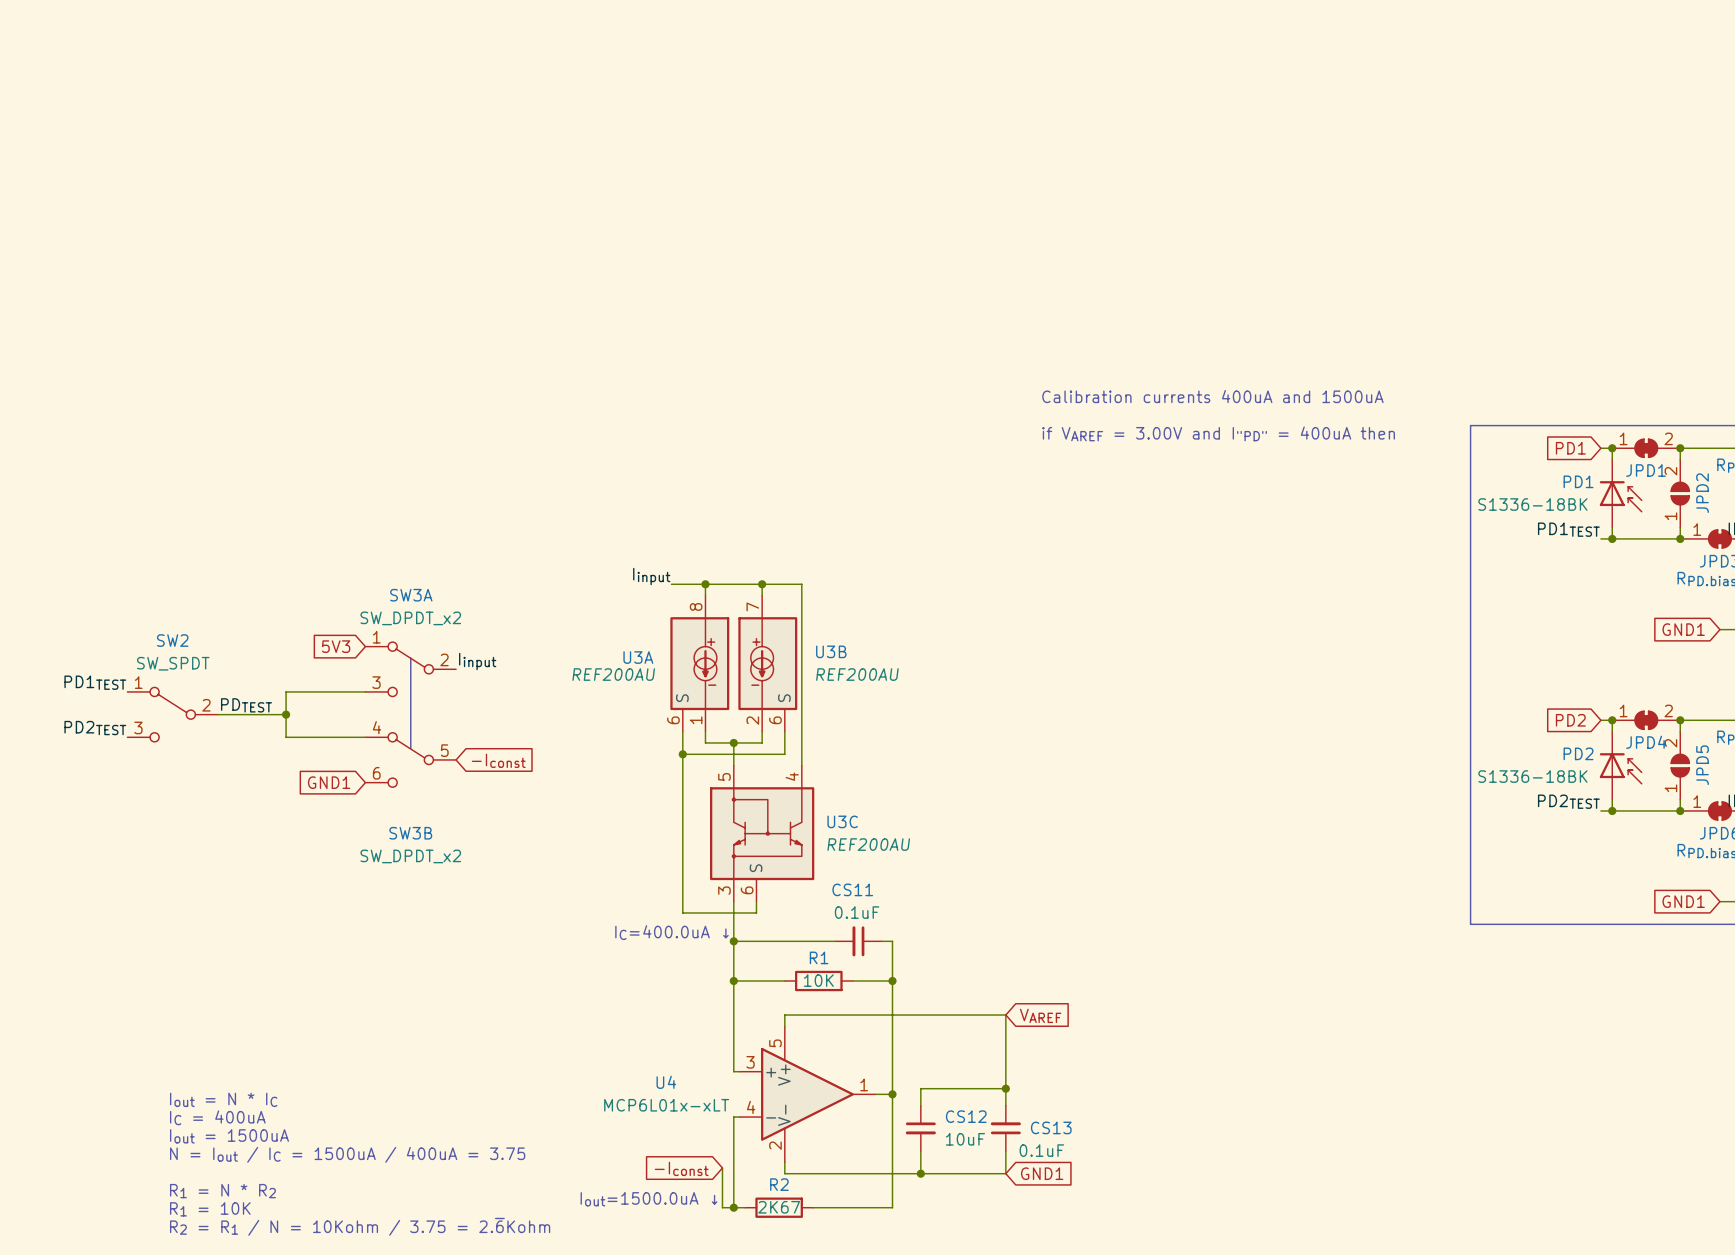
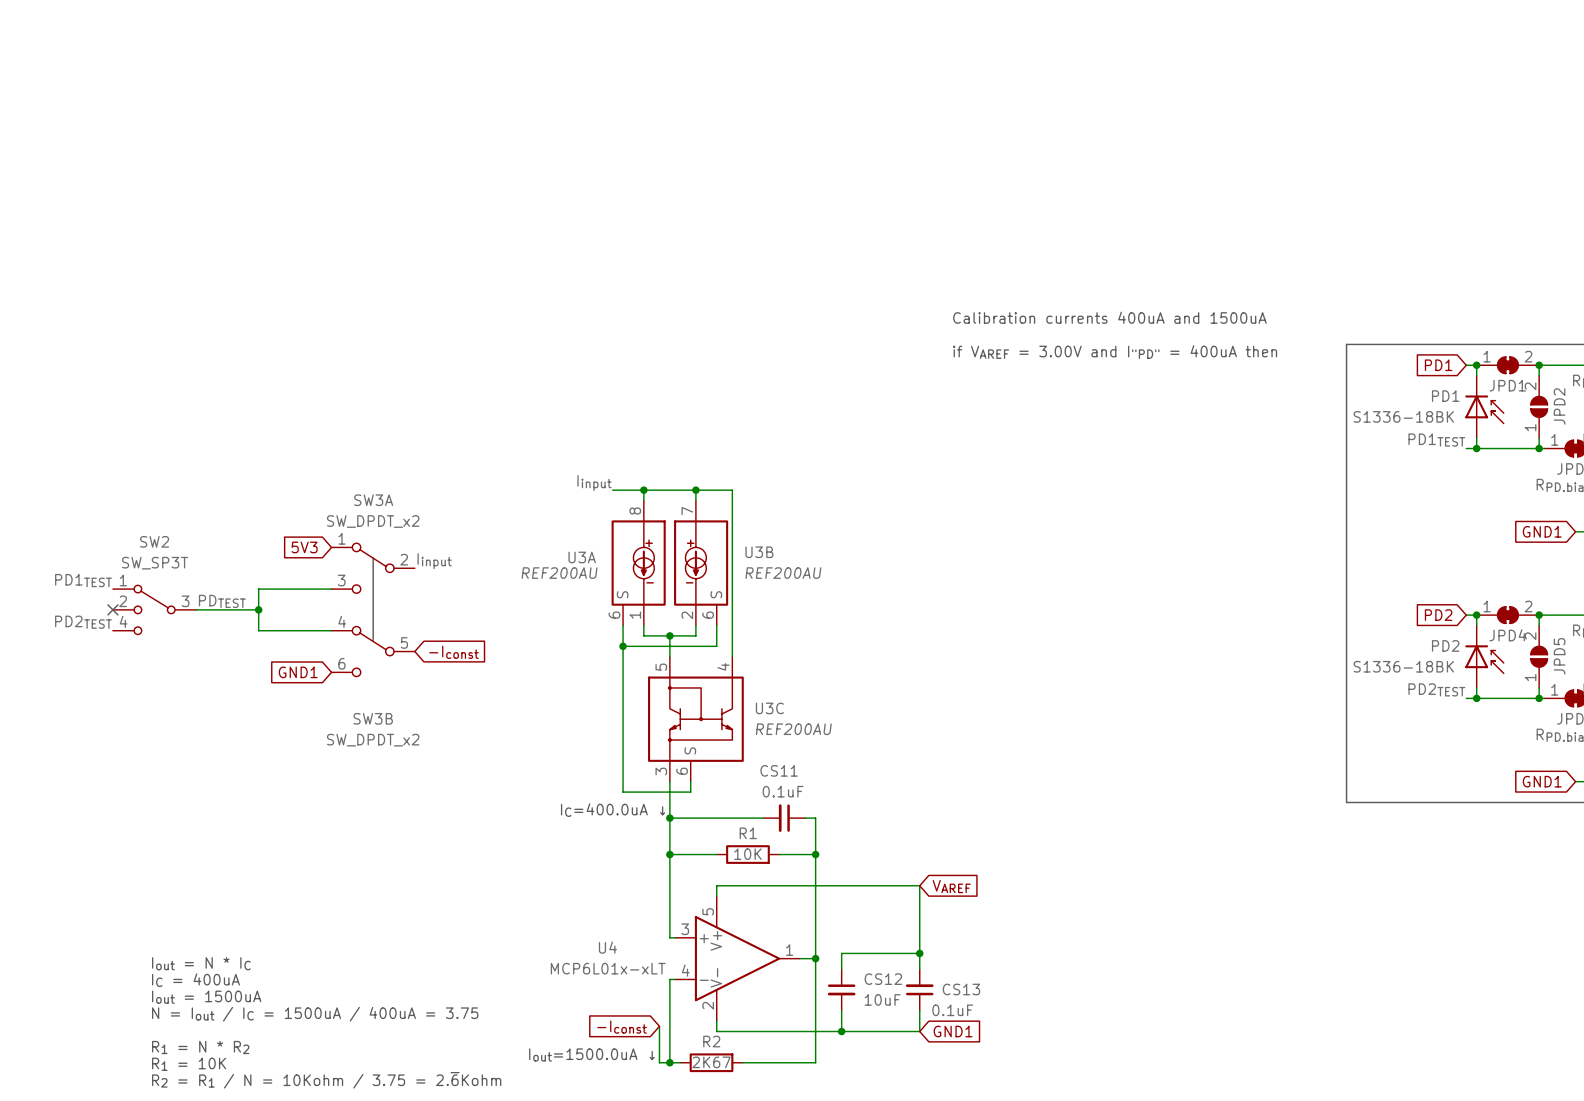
SW2 value: SW_SPDT (173, 663) -> SW_SP3T (155, 563)
SW2 symbol: [127, 687, 219, 742] -> [112, 585, 197, 635]
no-connect mark: none -> (112, 609)

